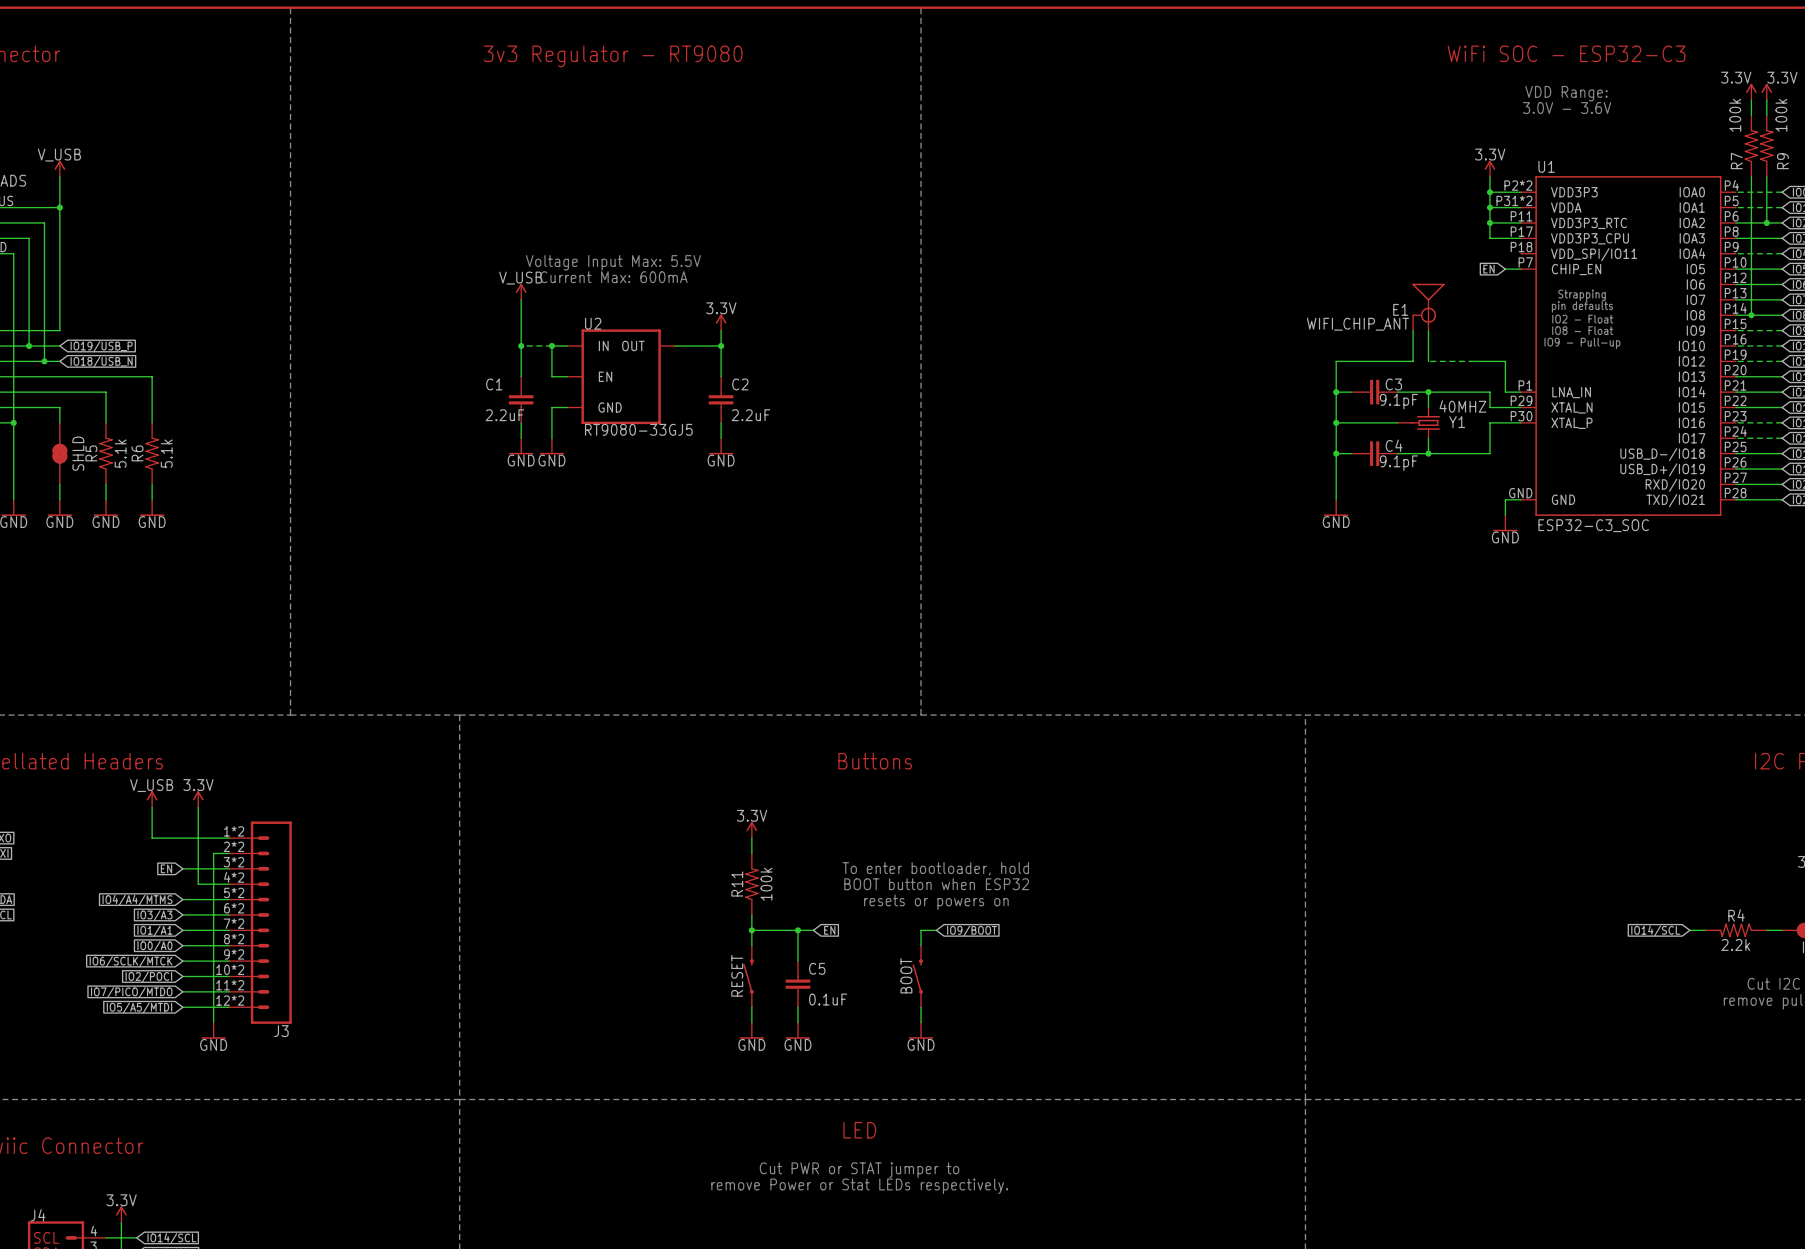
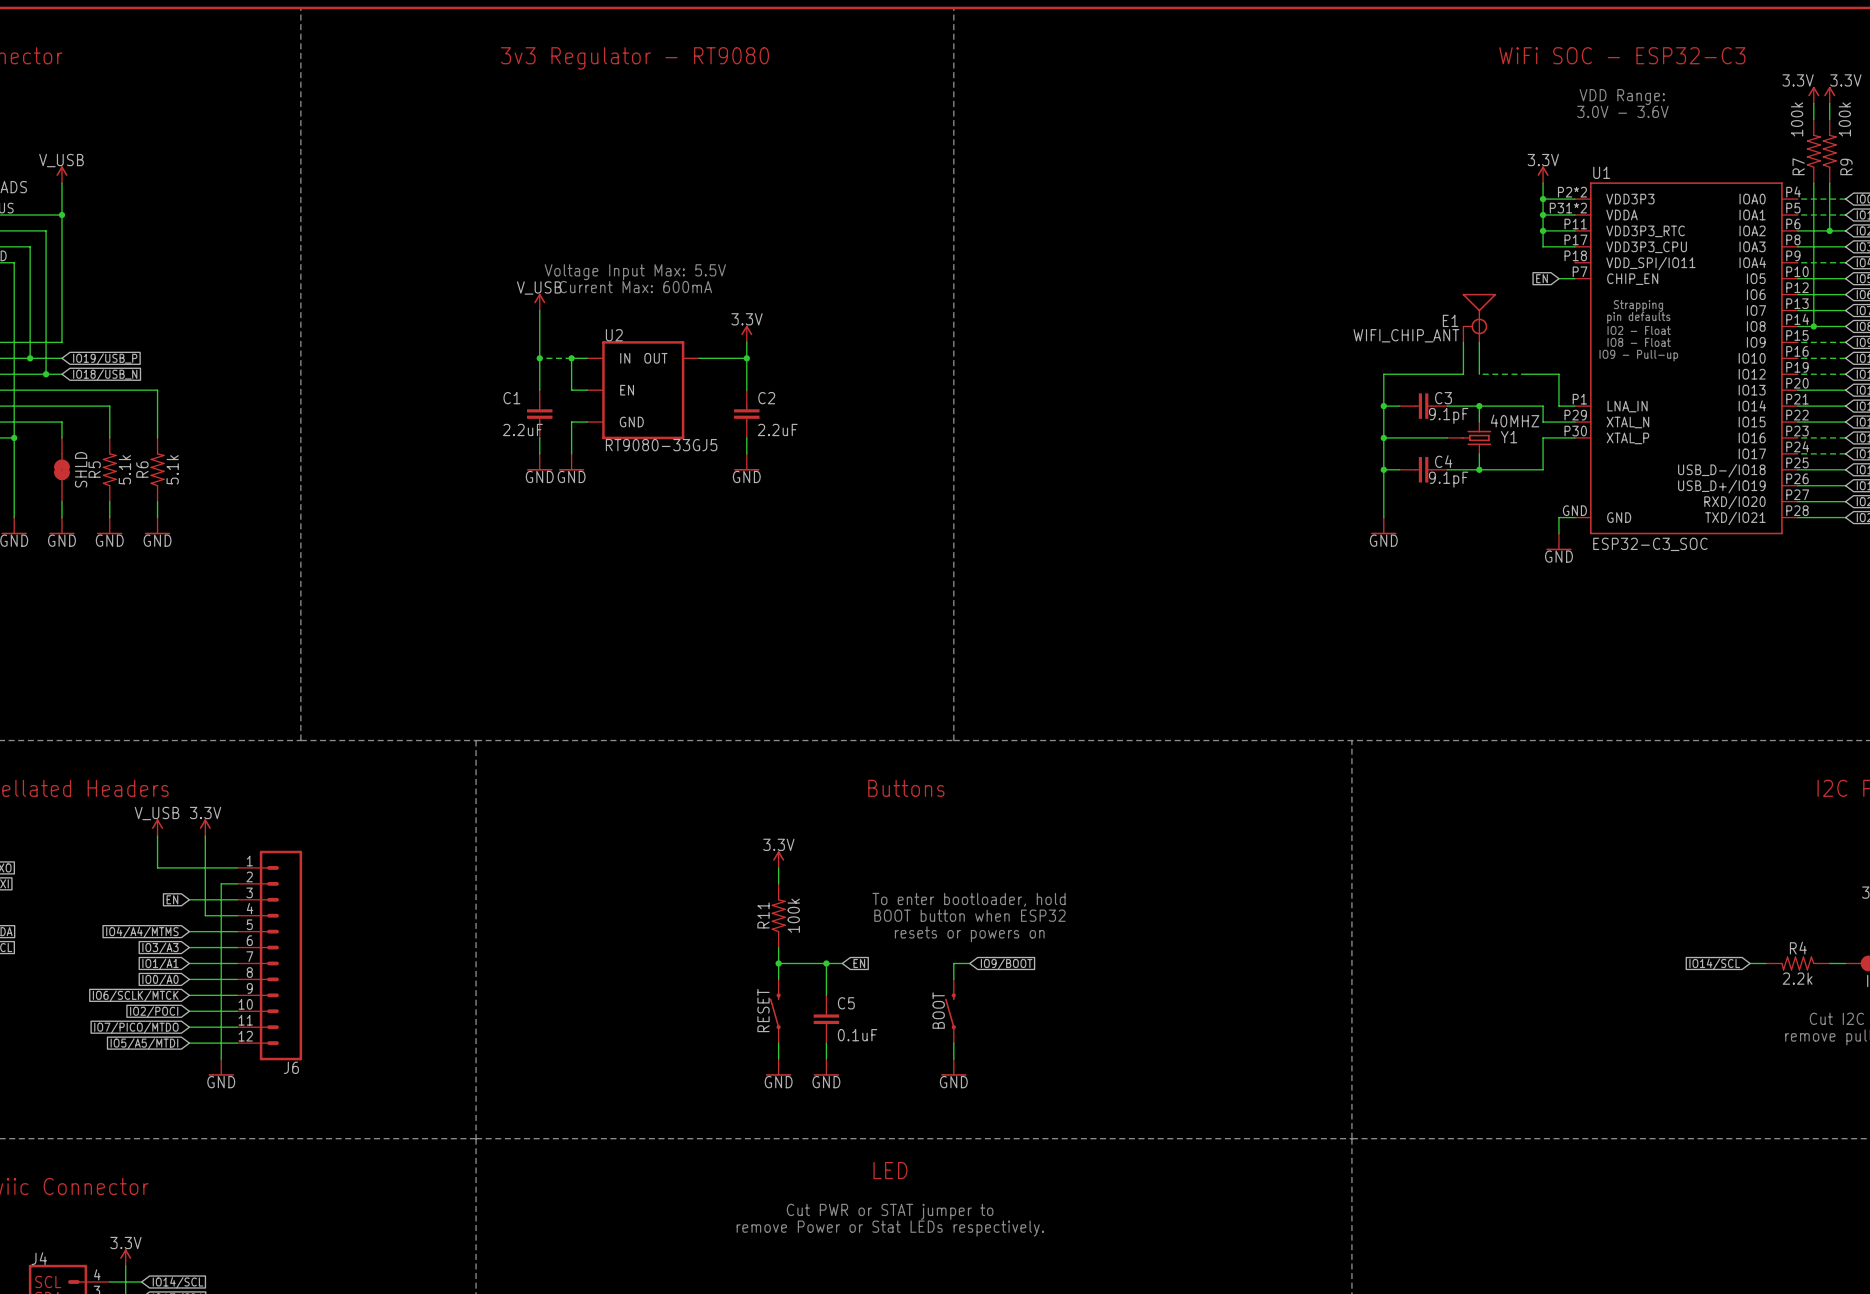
J3 symbol: [229, 821, 292, 1024] -> [237, 850, 303, 1061]
J3 name: J3 (281, 1031) -> J6 (291, 1067)

